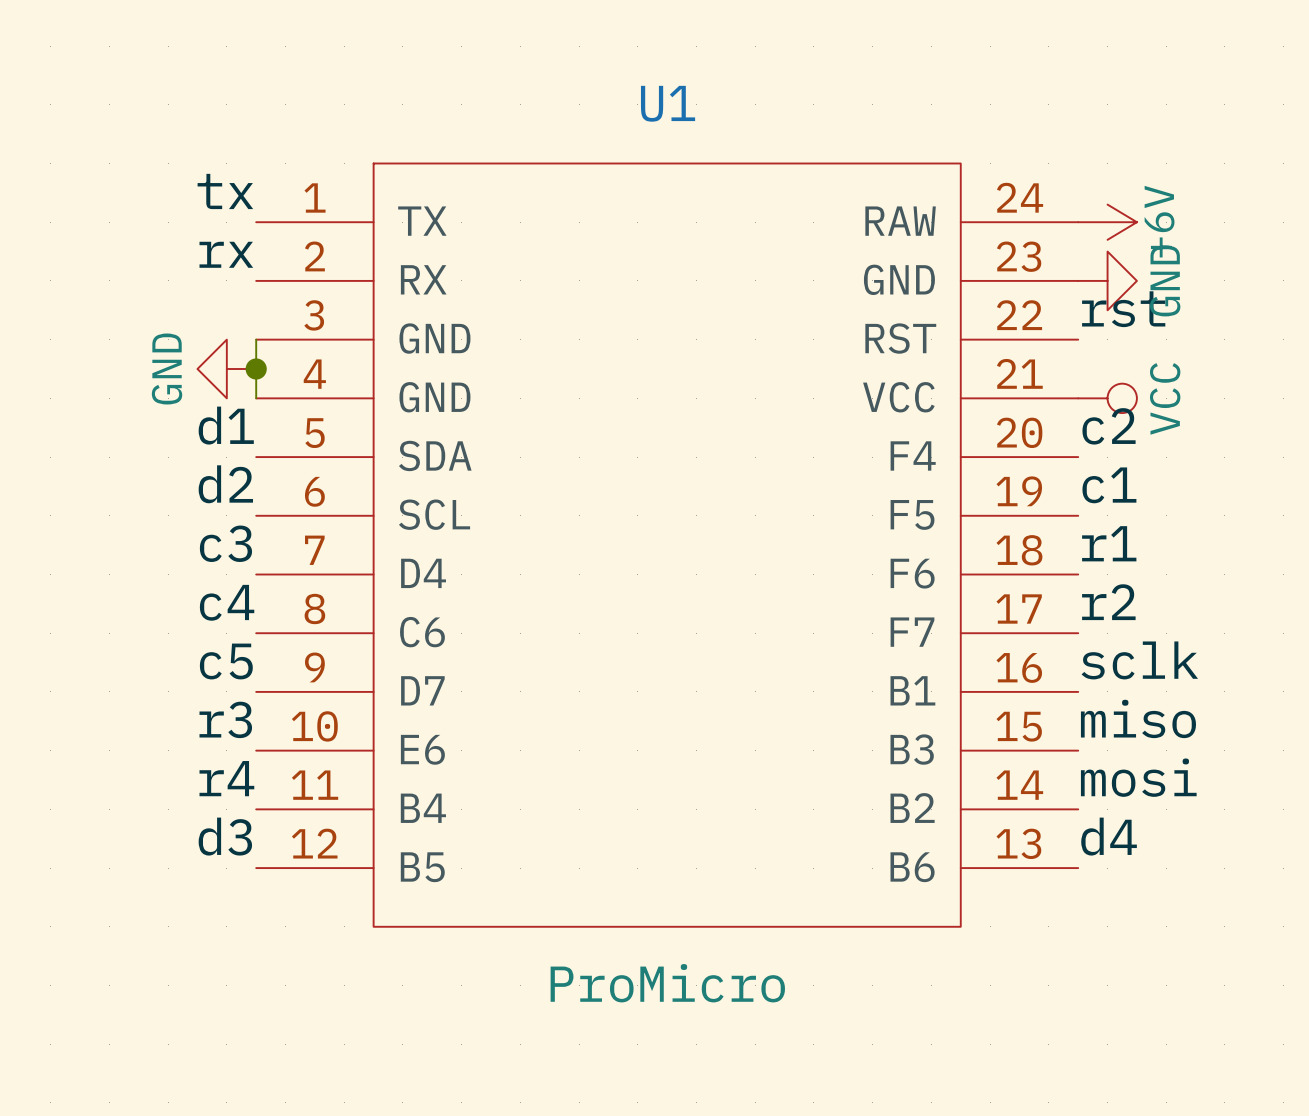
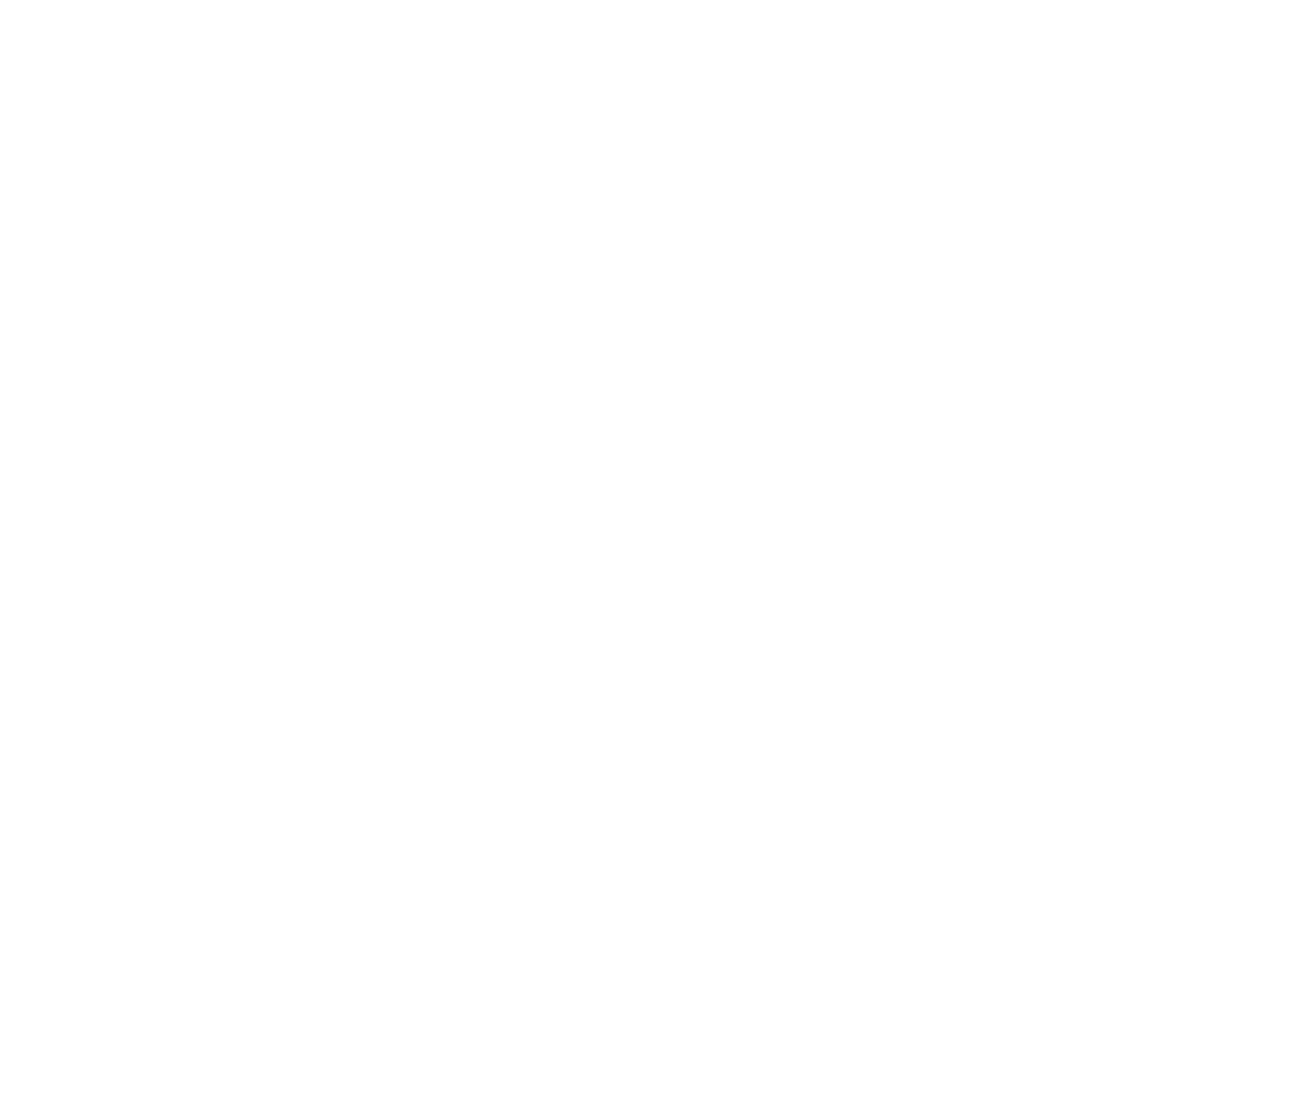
label: tx (225, 191) -> none
power symbol: +6V (1107, 222) -> none
label: rx (226, 254) -> none
power symbol: GND (1107, 280) -> none
label: rst (1123, 309) -> none
wire: (256, 339) (256, 398) -> none
power symbol: GND (226, 369) -> none
junction: (256, 369) -> none
power symbol: VCC (1107, 398) -> none
label: d1 (226, 425) -> none
label: c2 (1109, 426) -> none
label: d2 (225, 484) -> none
label: c1 (1109, 485) -> none
label: c3 (225, 543) -> none
label: r1 (1109, 543) -> none
U1: ProMicro (667, 545) -> none
label: c4 (227, 602) -> none
label: r2 (1108, 602) -> none
label: sclk (1139, 660) -> none
label: c5 (226, 661) -> none
label: miso (1138, 718) -> none
label: r3 (225, 719) -> none
label: mosi (1138, 777) -> none
label: r4 (226, 778) -> none
label: d3 (225, 836) -> none
label: d4 (1109, 836) -> none

